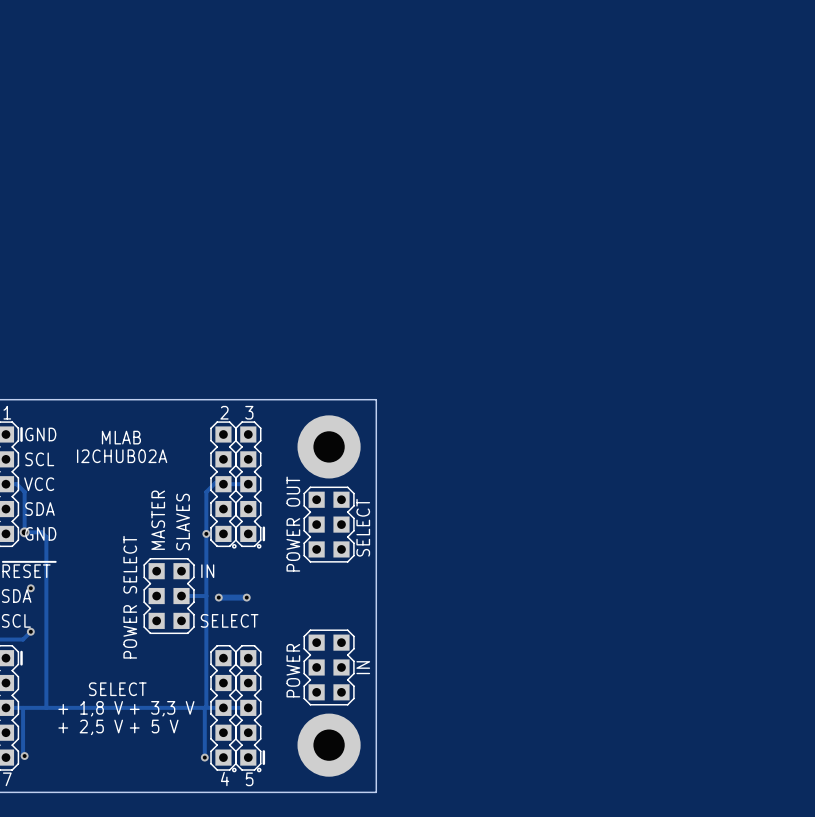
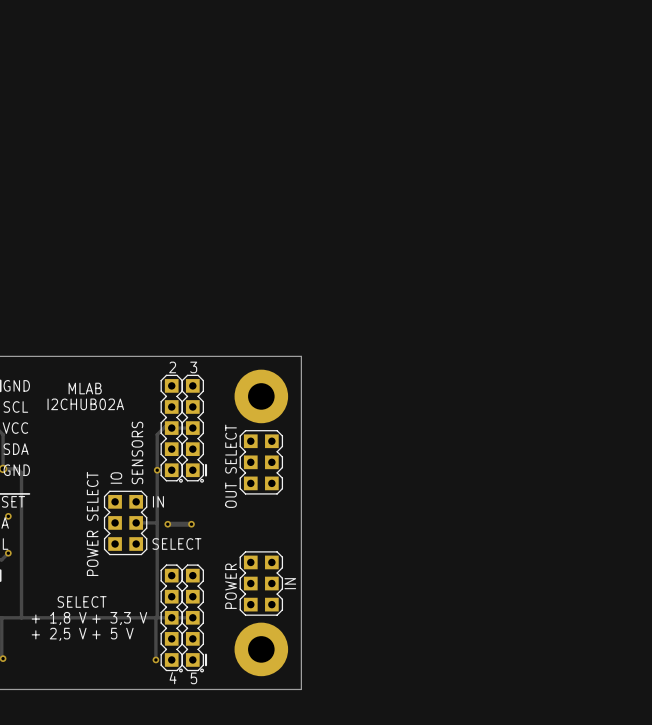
text: MASTER (158, 520) -> IO (116, 478)
text: SLAVES (183, 522) -> SENSORS (137, 452)
text: POWER OUT (293, 524) -> OUT SELECT (231, 466)
text: SELECT (363, 527) -> none

